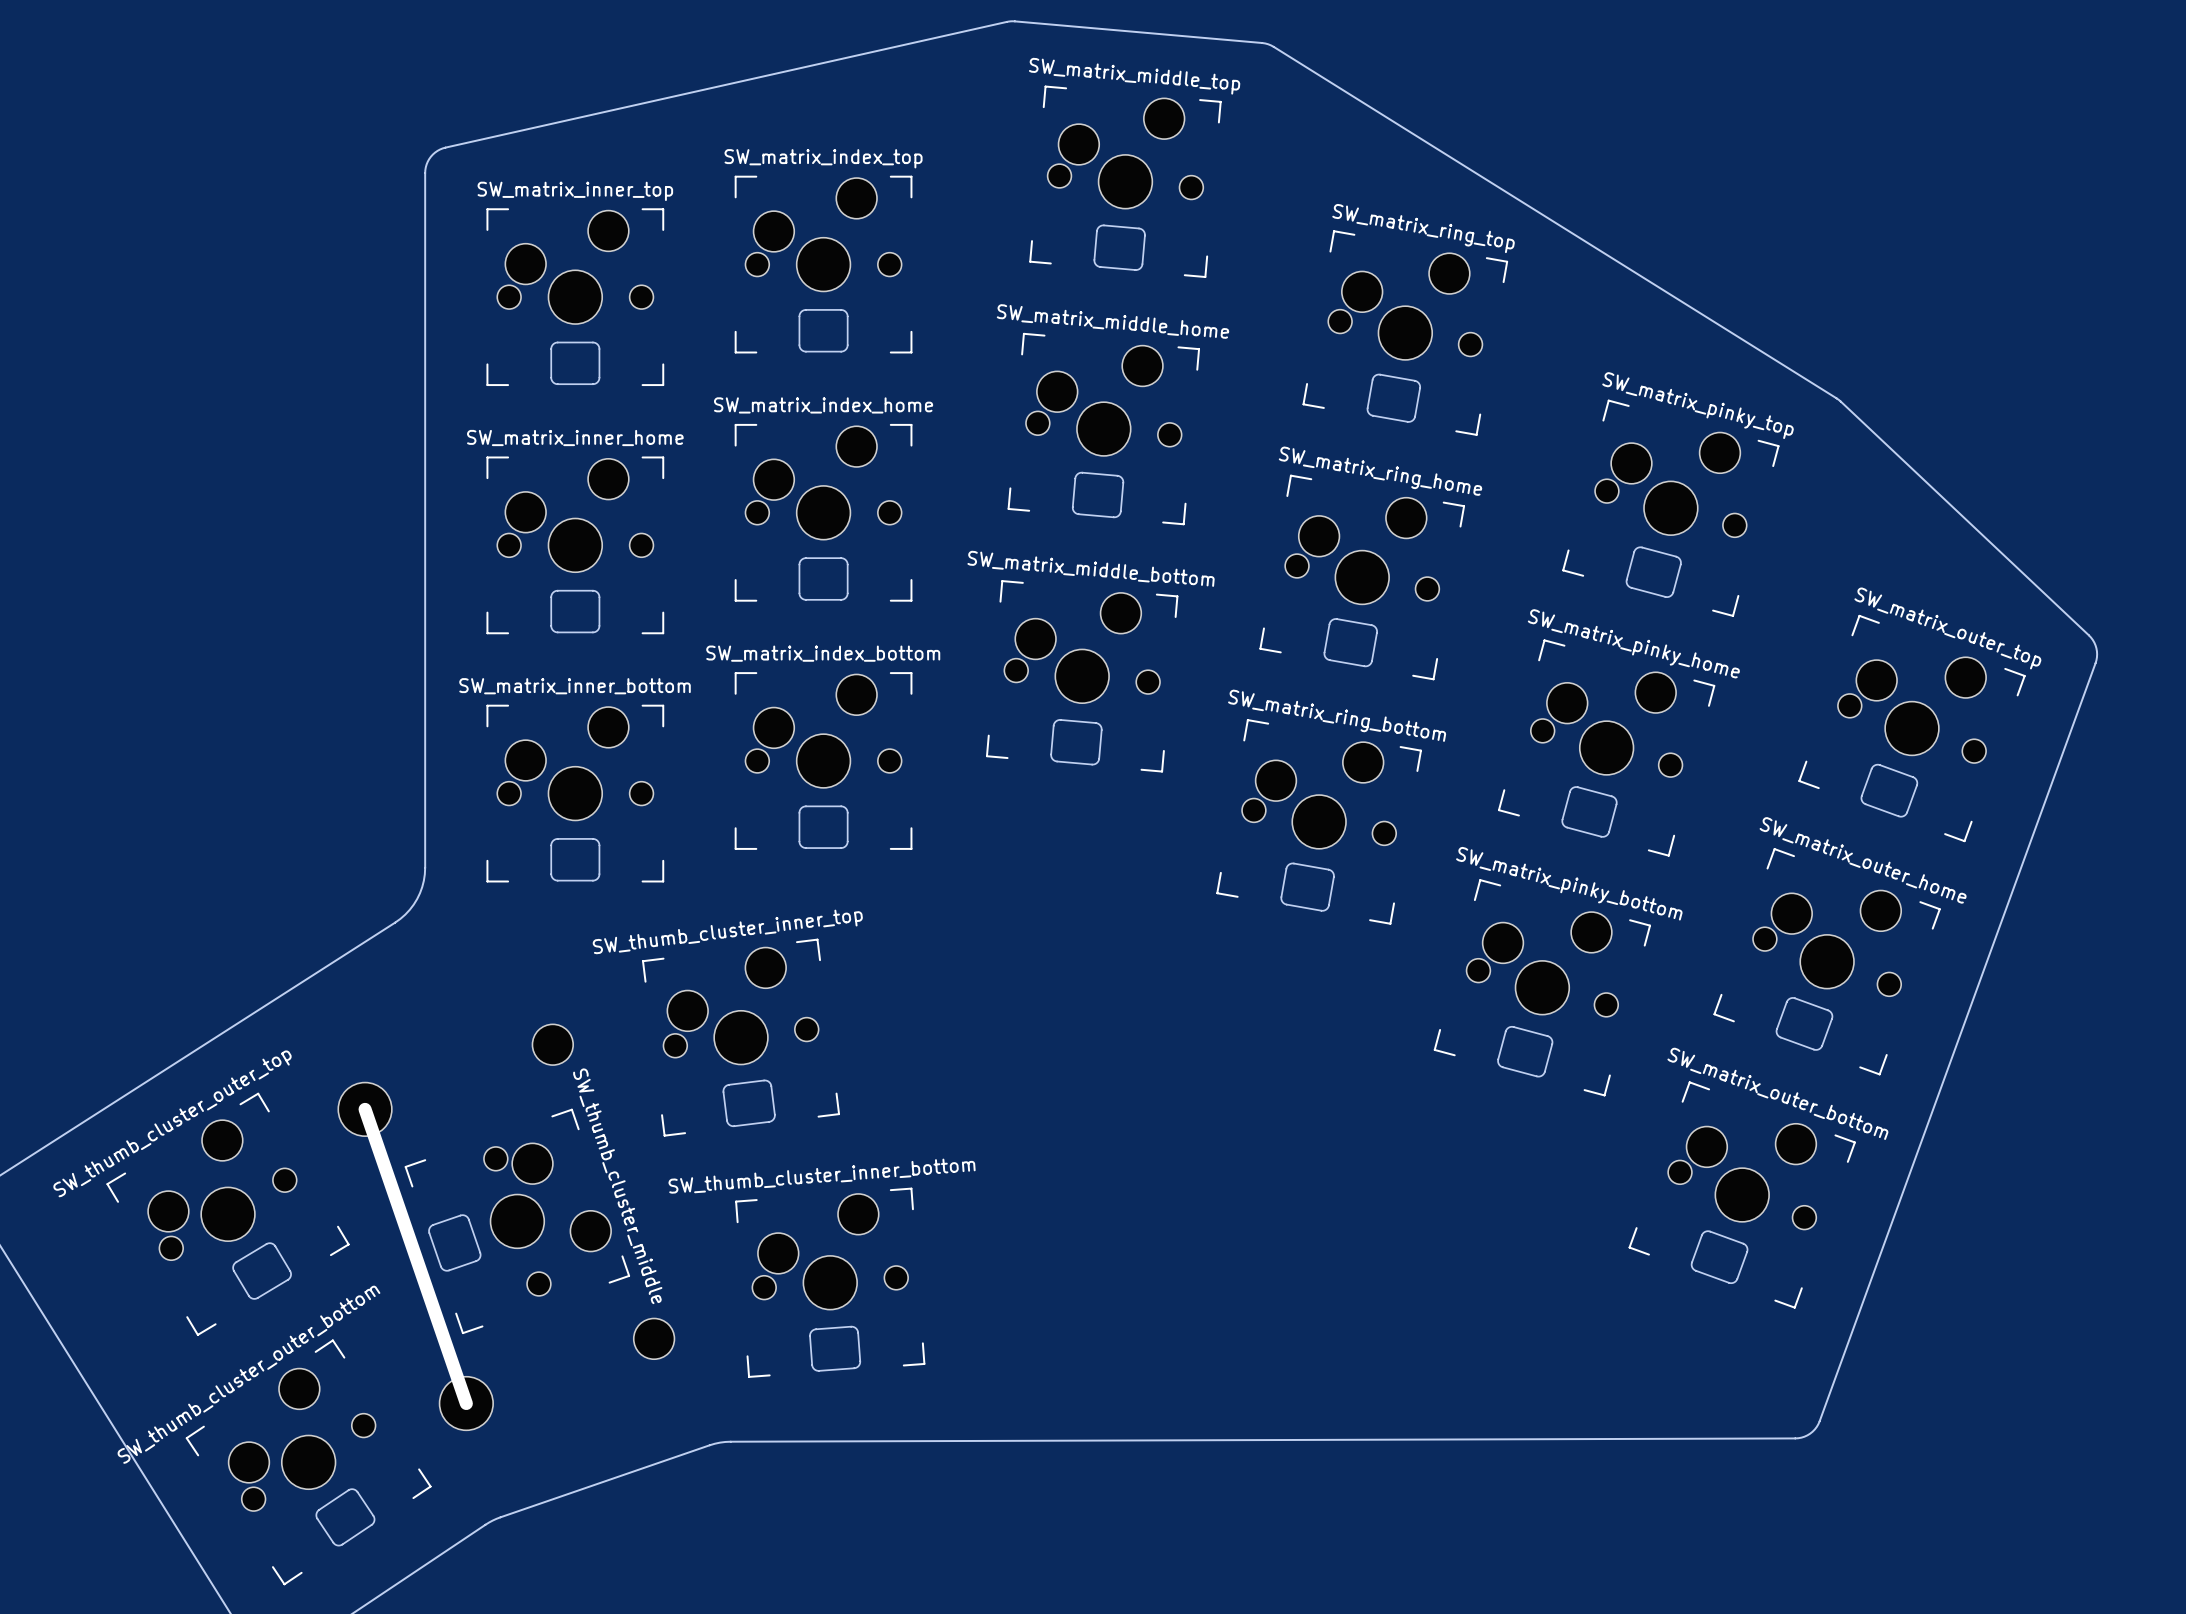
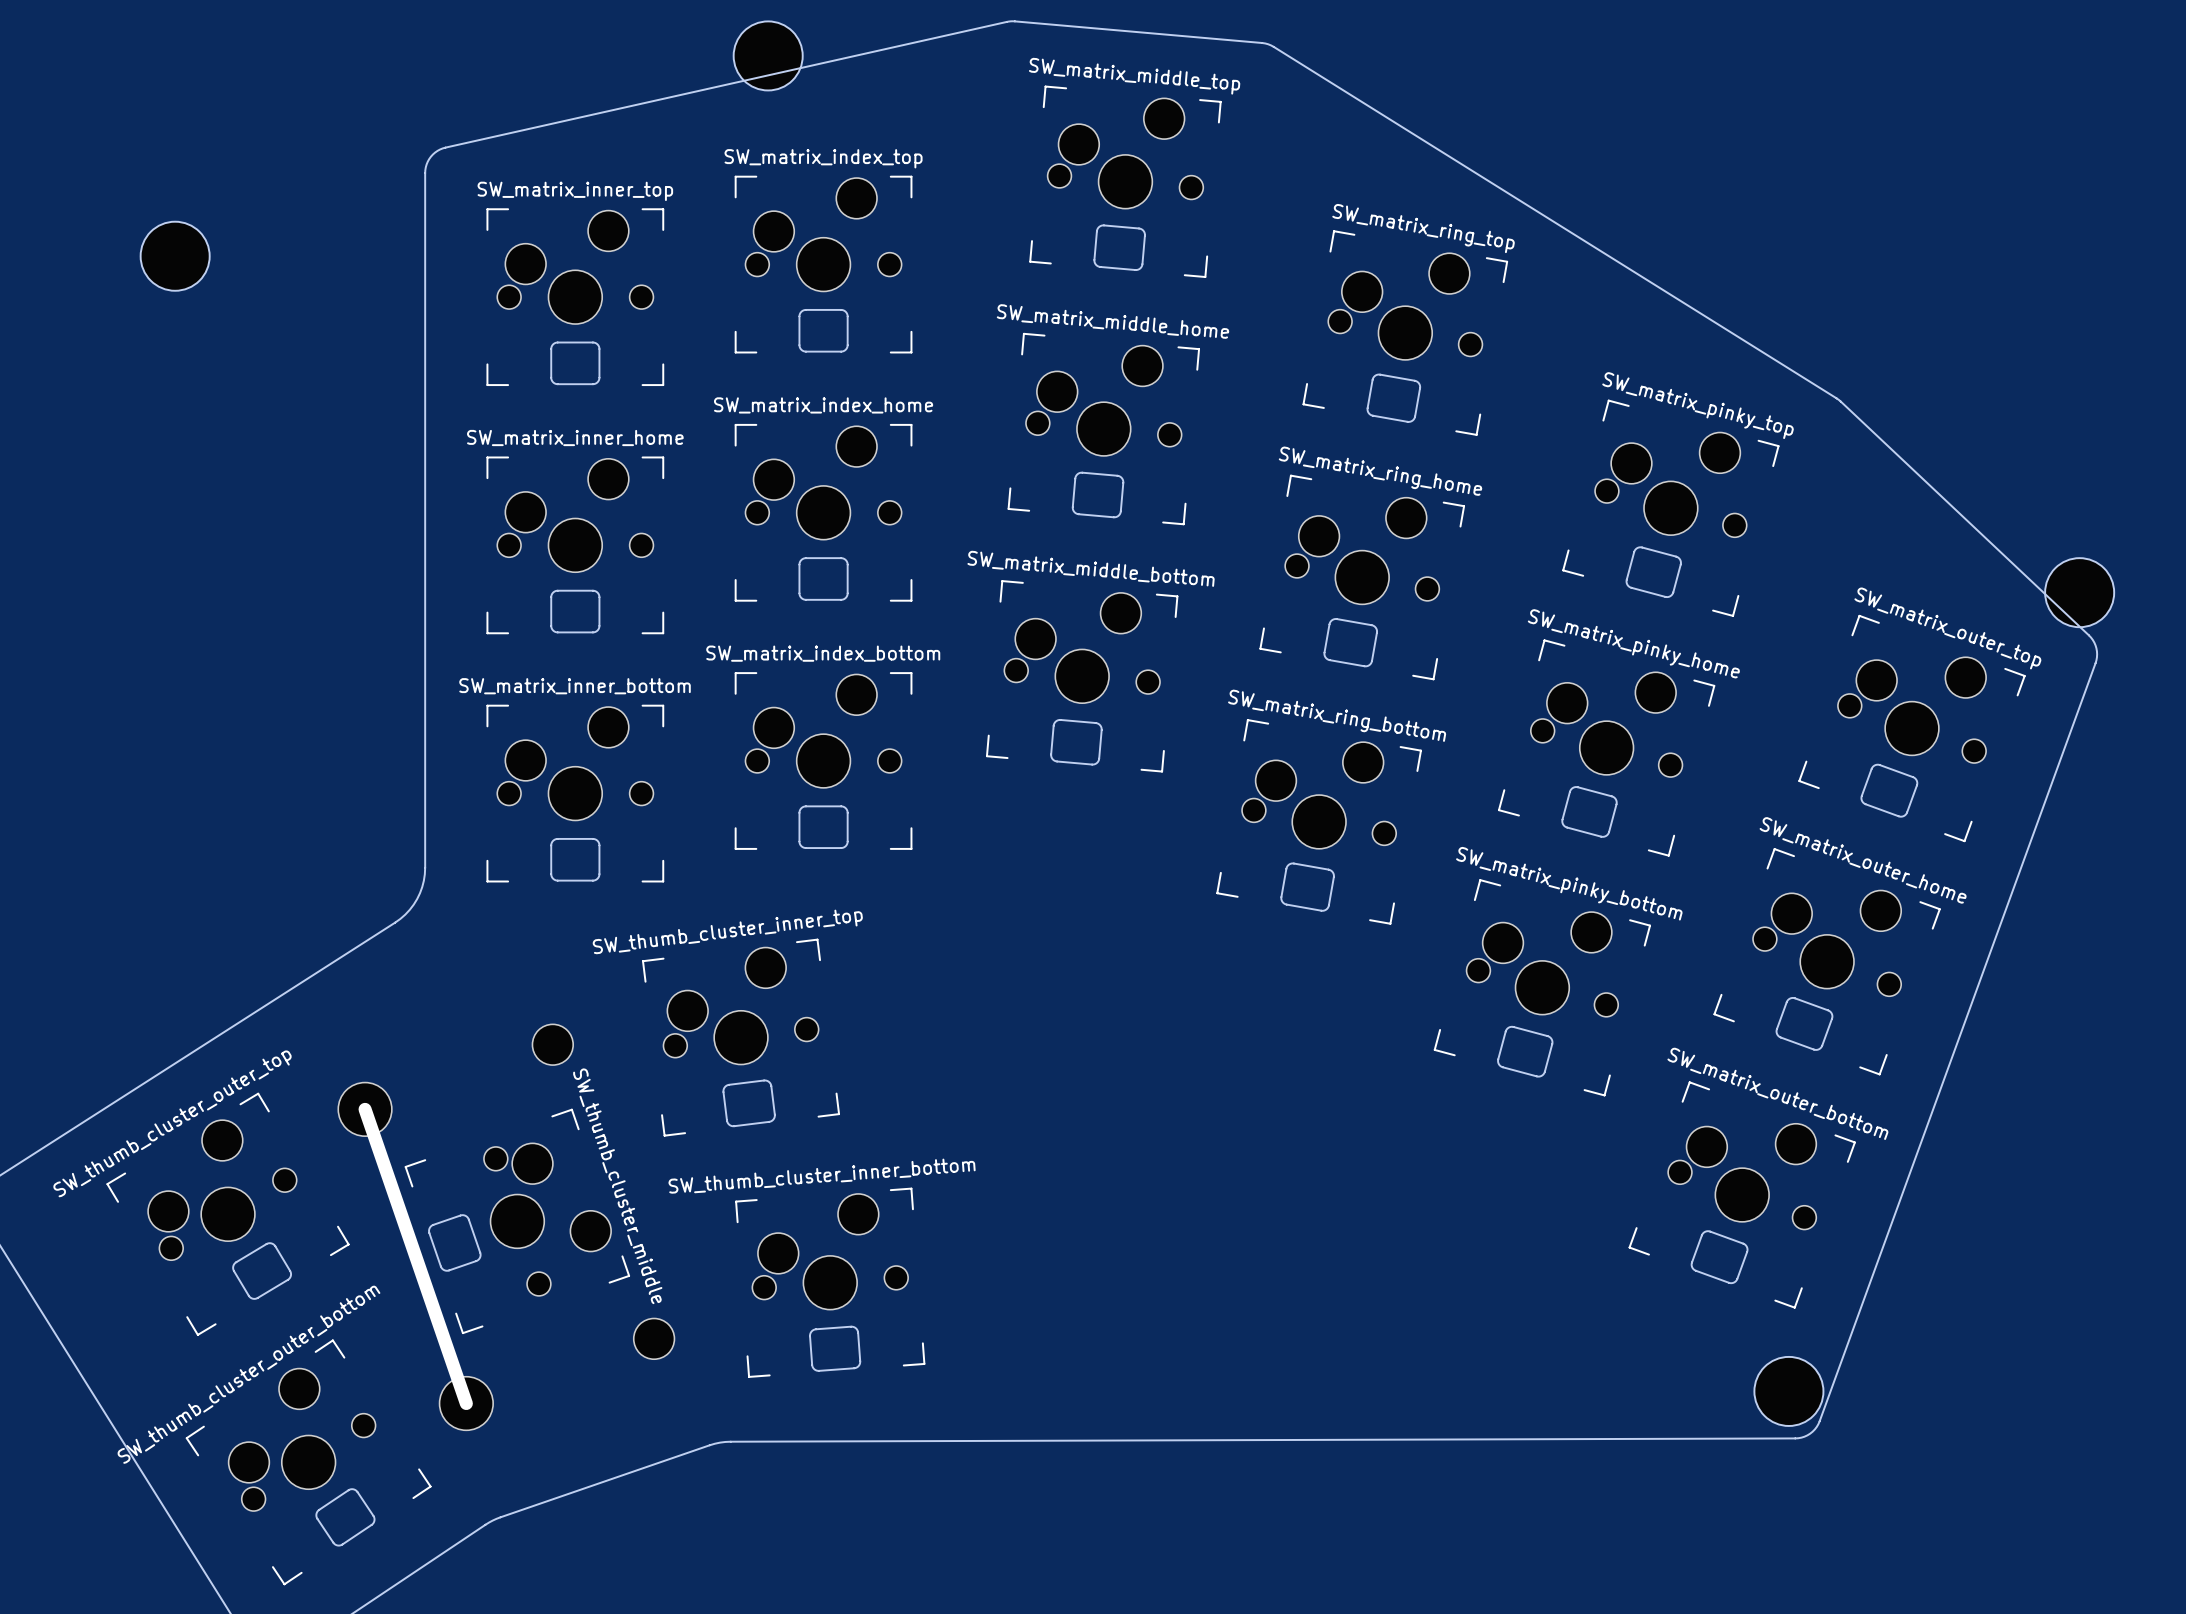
part: none -> (768, 55)
part: none -> (175, 256)
part: none -> (2079, 592)
part: none -> (1788, 1391)

